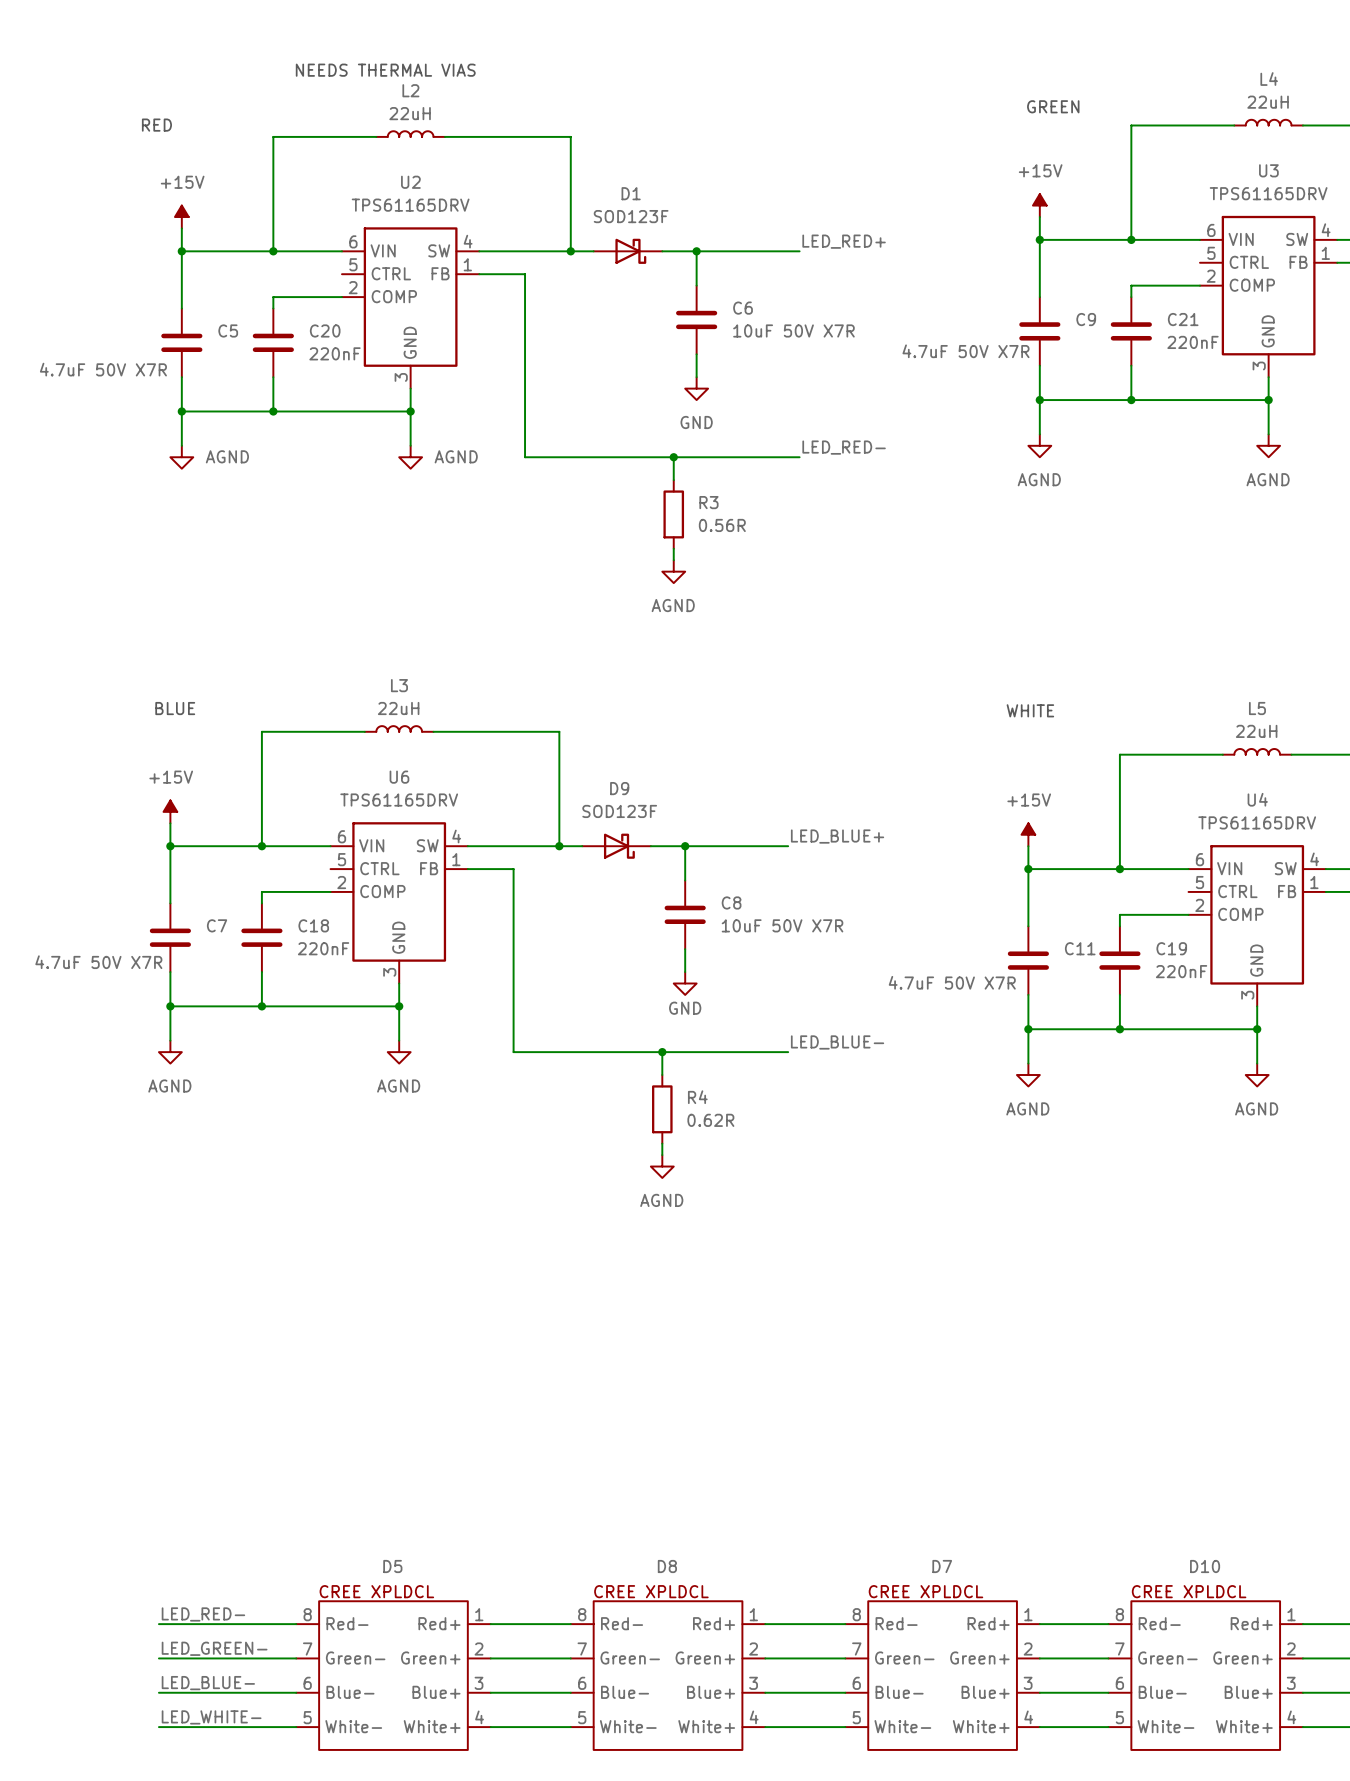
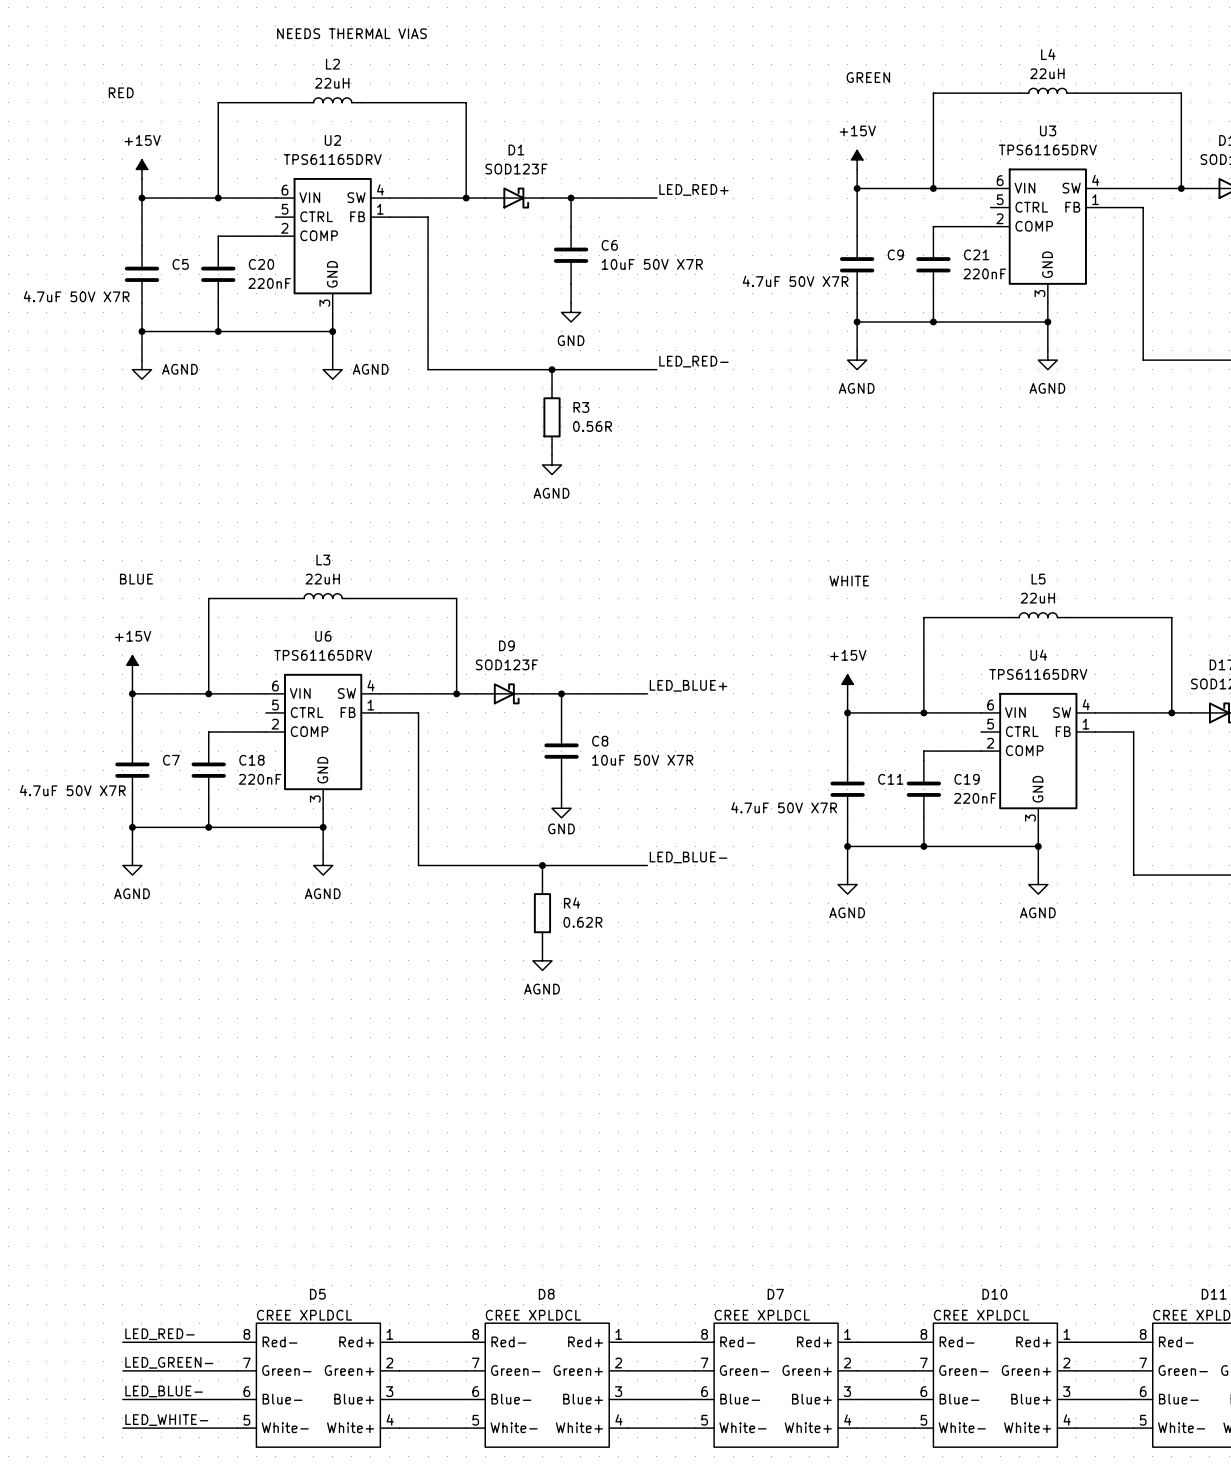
text position: NEEDS THERMAL VIAS (385, 70) -> NEEDS THERMAL VIAS (351, 33)

